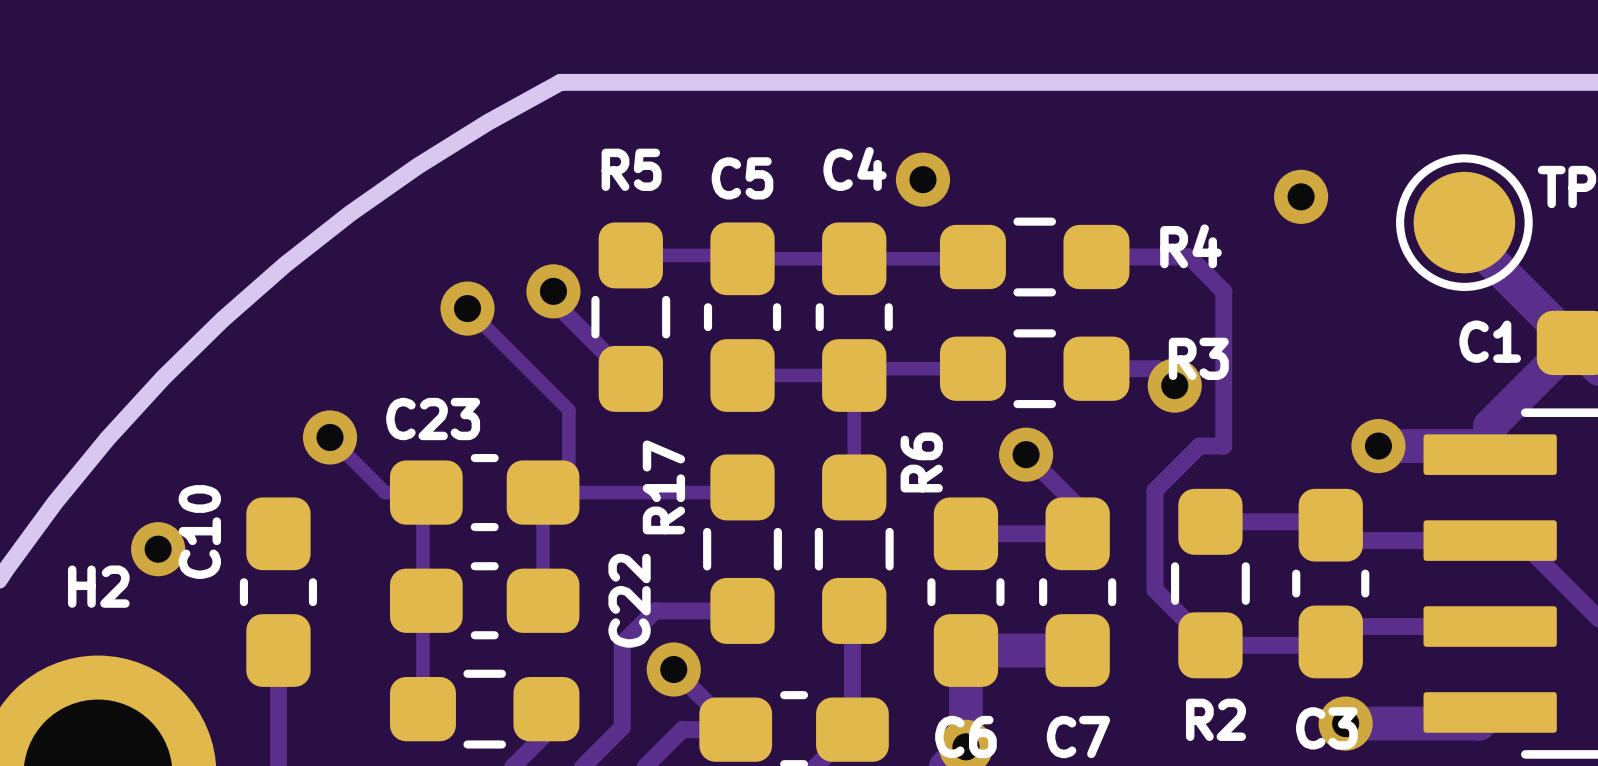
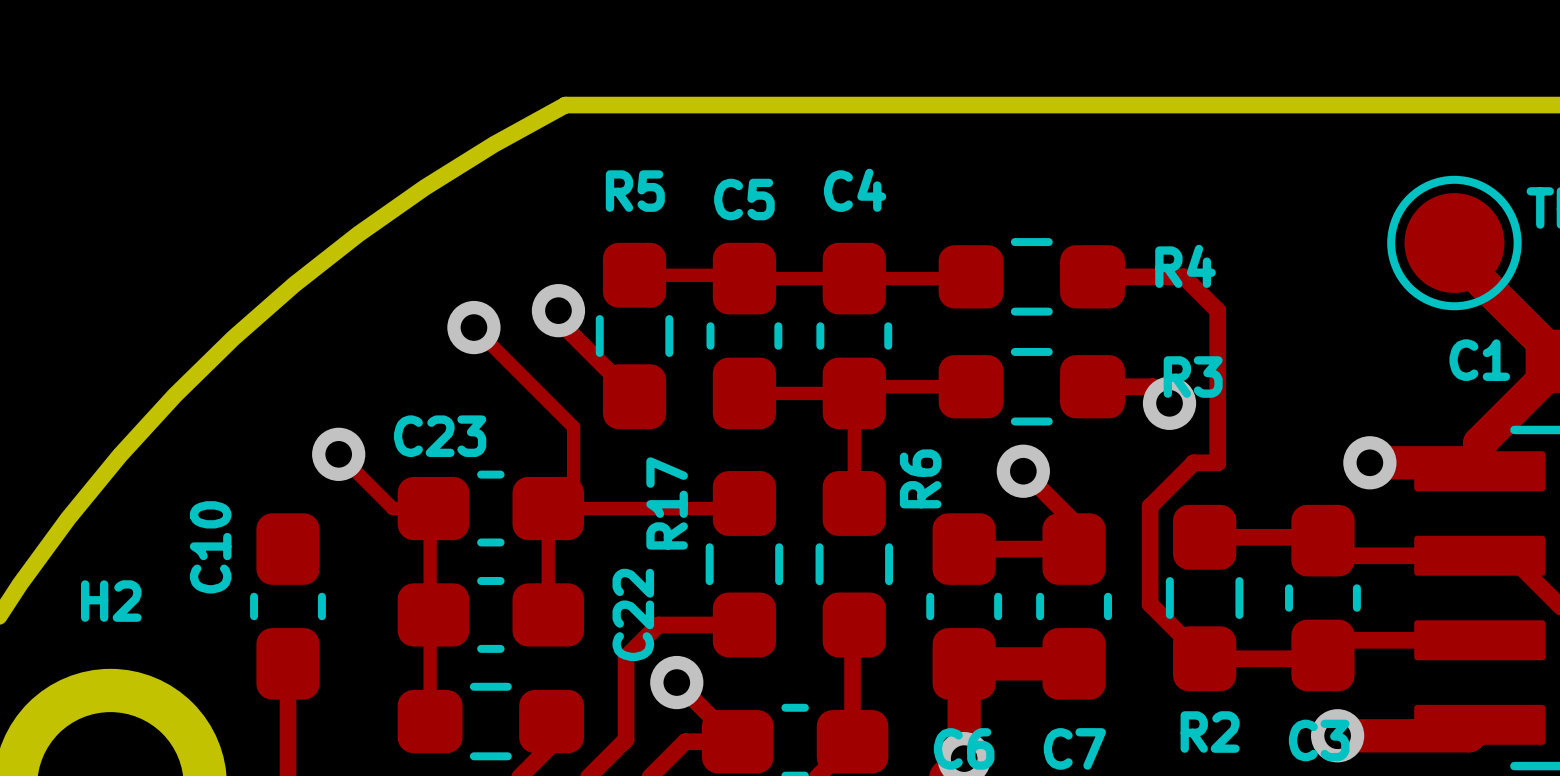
via: (922, 179) -> none
via: (1301, 196) -> none
via: (158, 549) -> none

